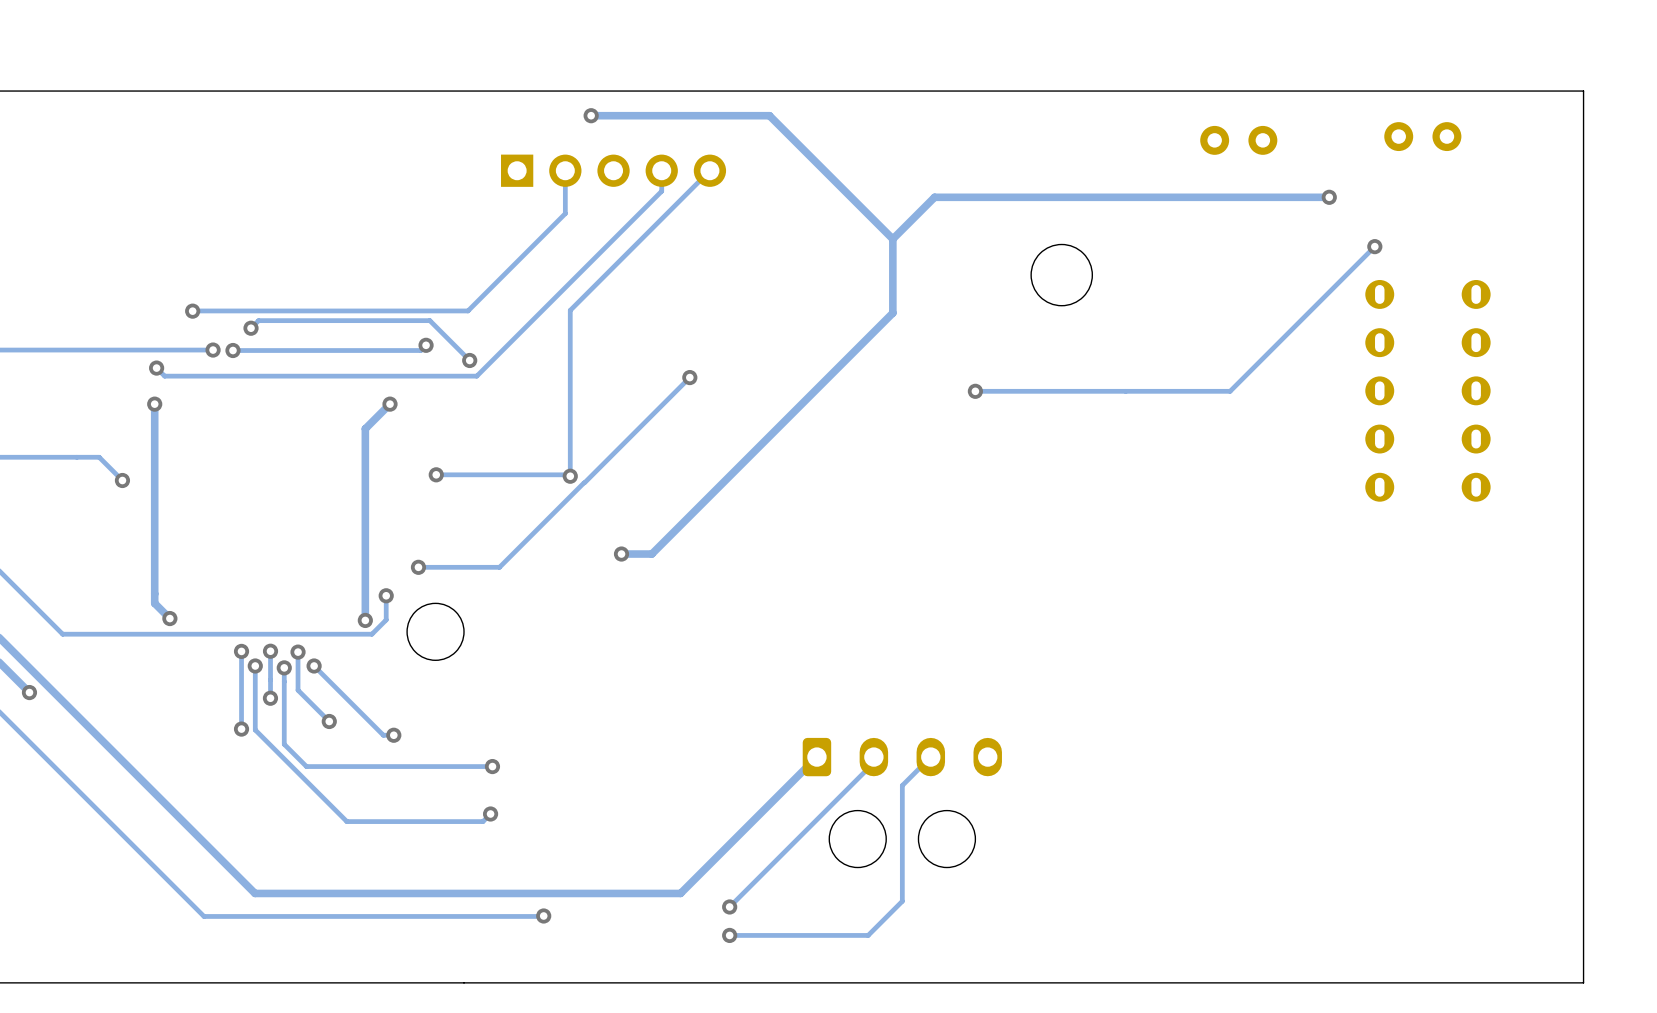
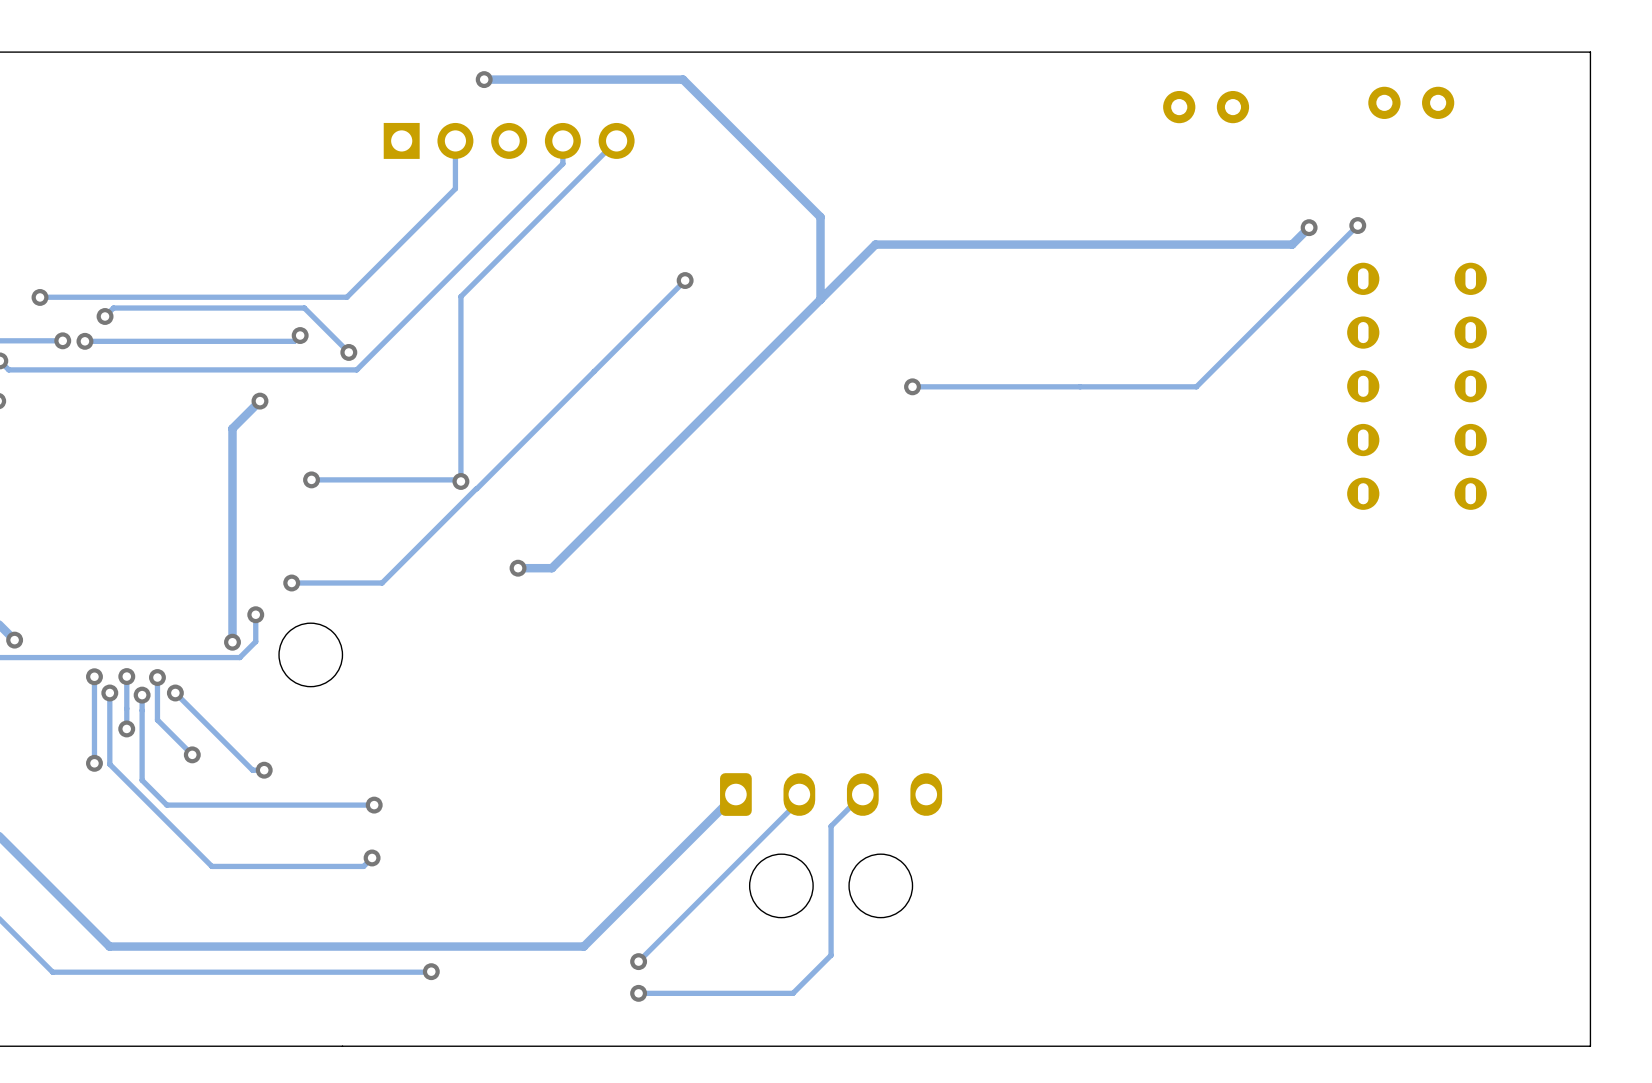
track: (1329, 197) (934, 197) (892, 239) -> none
via position: (1329, 197) -> (1309, 227)
round board edge: [1030, 244, 1093, 307] -> none
track: none -> (1309, 227) (1292, 244) (875, 244) (820, 299)
track: none -> (685, 280) (594, 371)
via: none -> (685, 280)
via: (689, 377) -> none

